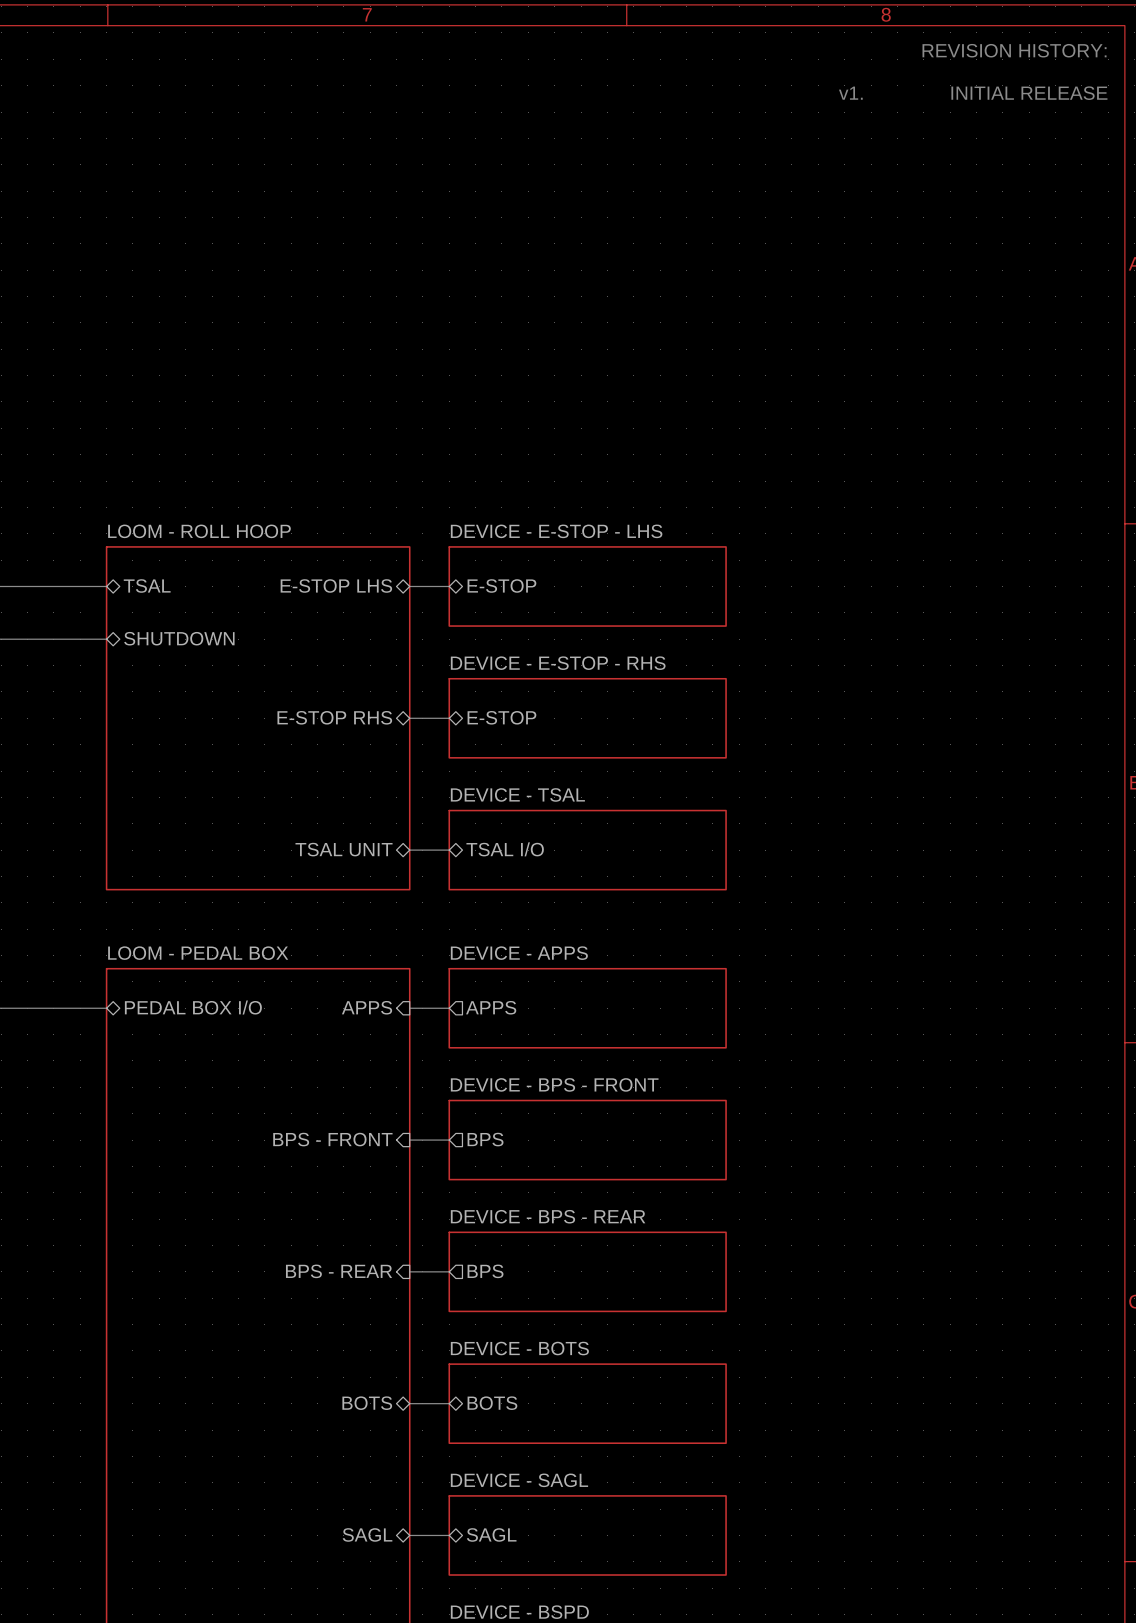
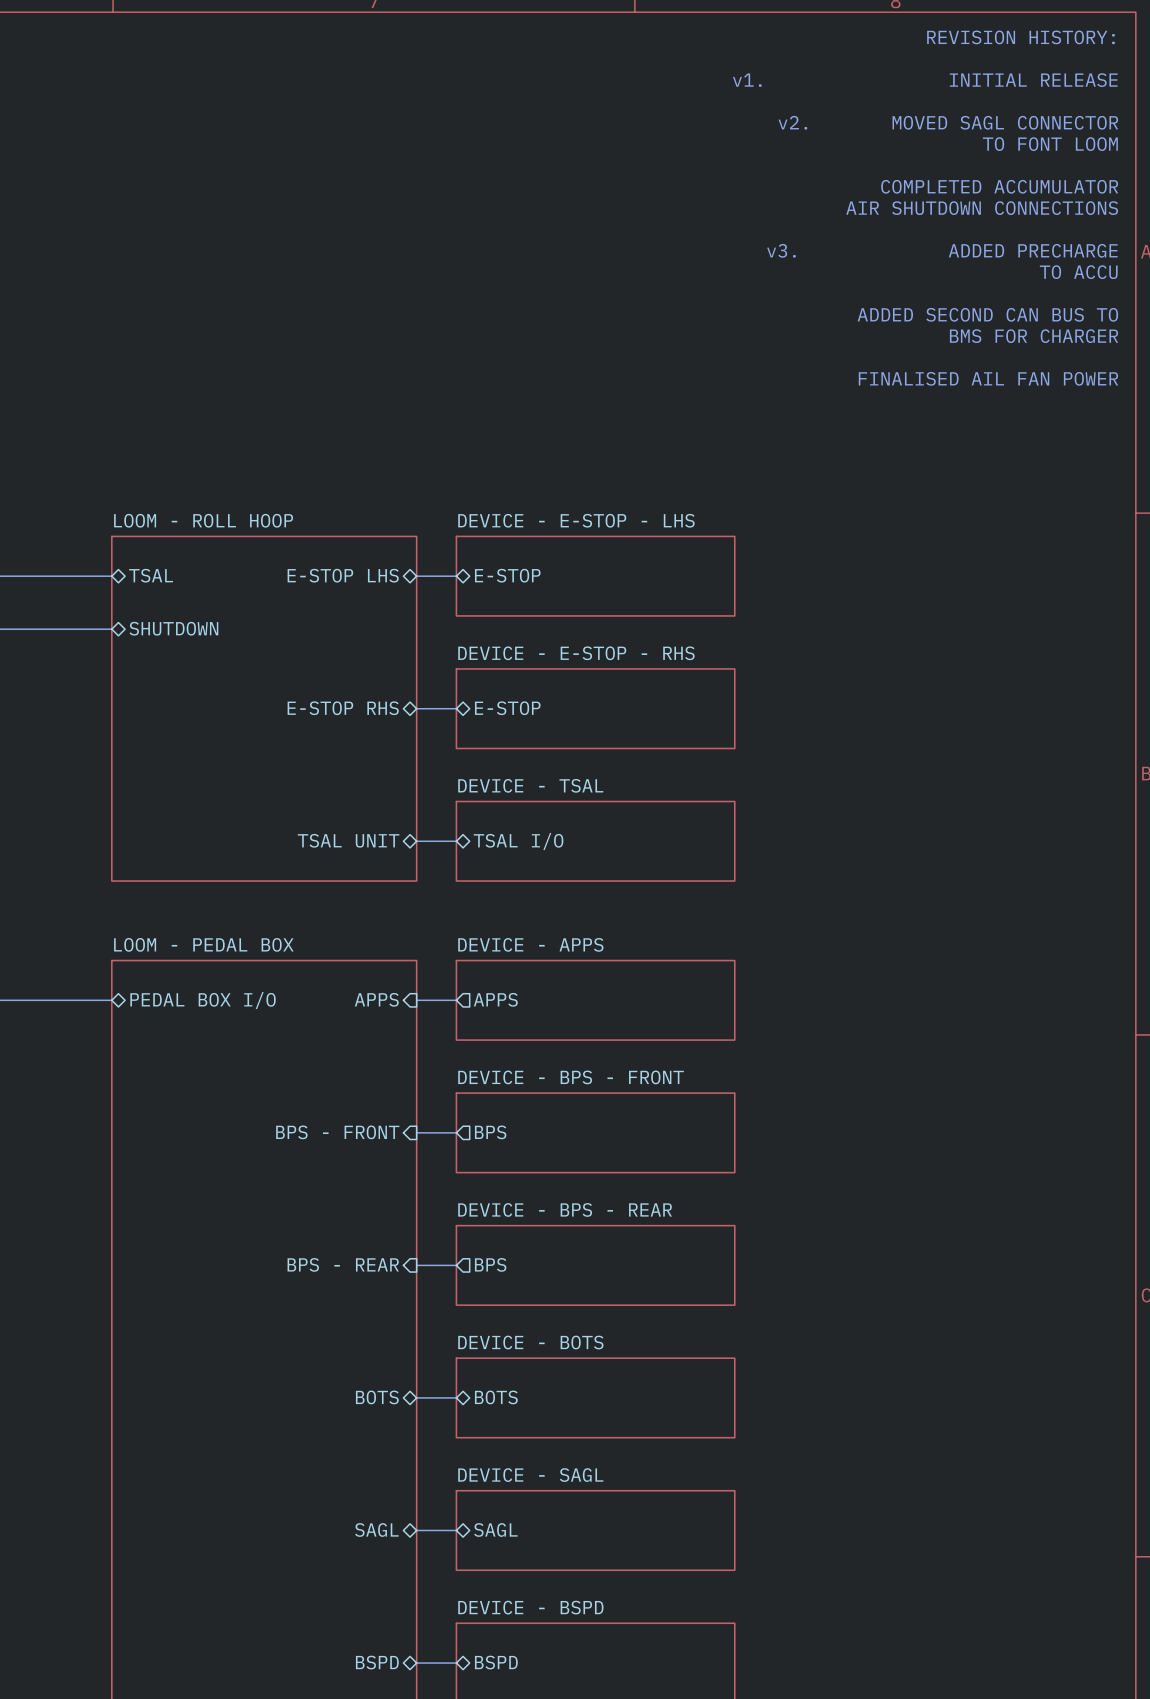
text: none -> v2. MOVED SAGL CONNECTOR (948, 122)
text: none -> TO FONT LOOM (1050, 144)
text: none -> COMPLETED ACCUMULATOR (999, 186)
text: none -> AIR SHUTDOWN CONNECTIONS (982, 208)
text: none -> v3. ADDED PRECHARGE (942, 250)
text: none -> TO ACCU (1078, 272)
text: none -> ADDED SECOND CAN BUS TO (987, 314)
text: none -> BMS FOR CHARGER (1034, 336)
text: none -> FINALISED AIL FAN POWER (988, 378)

